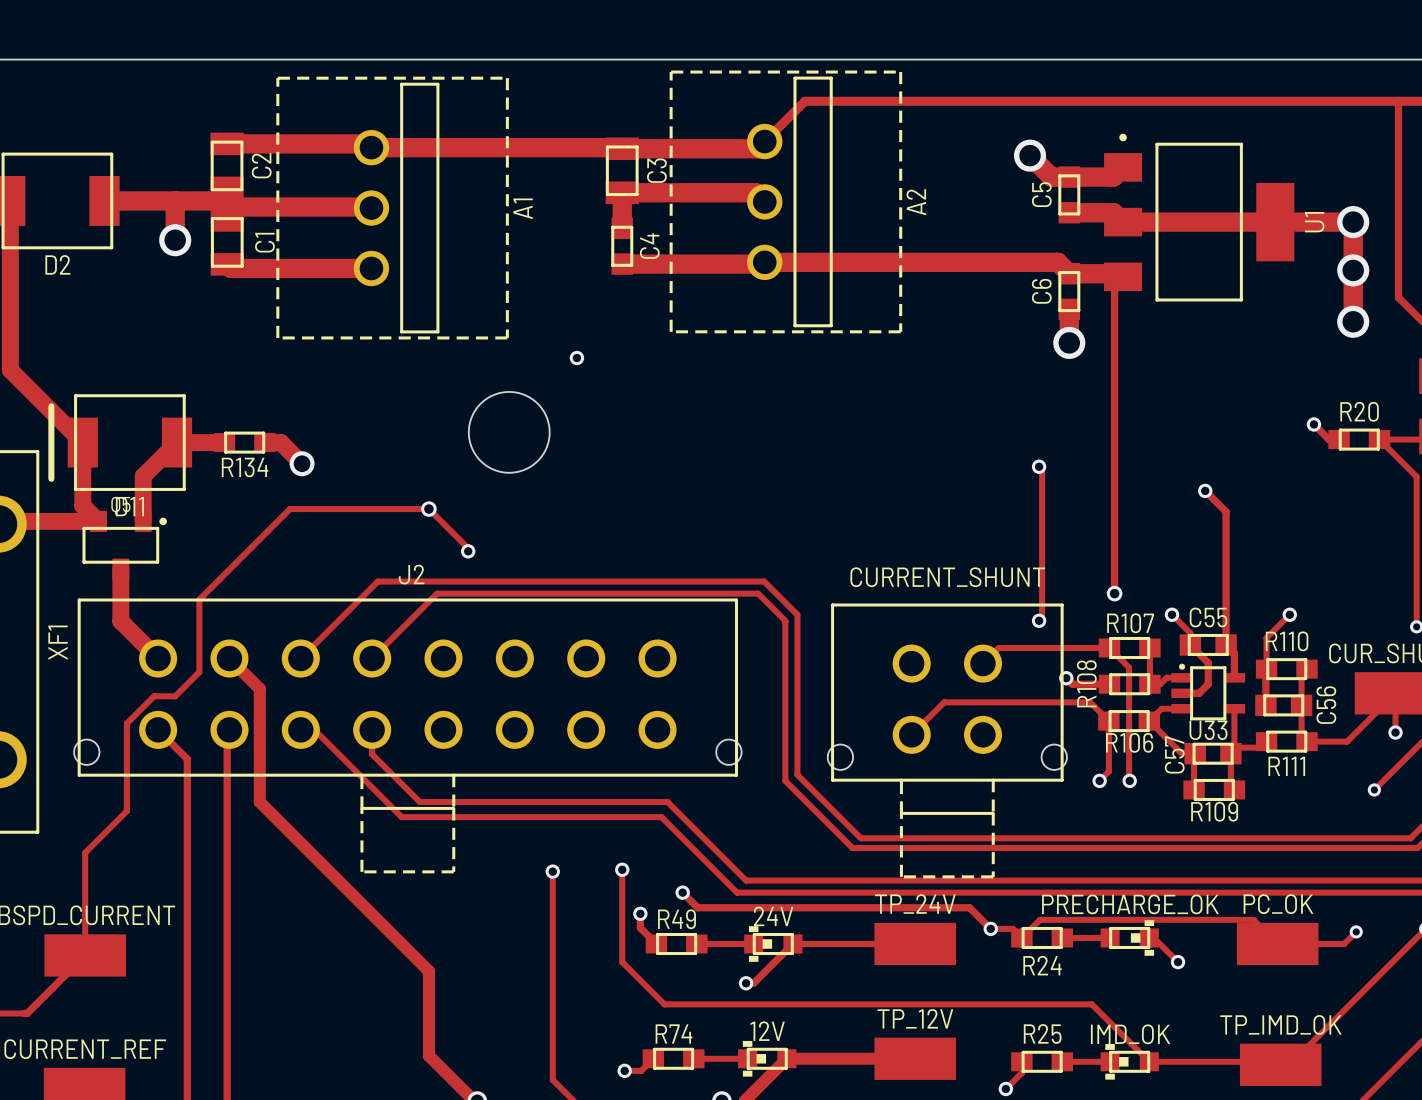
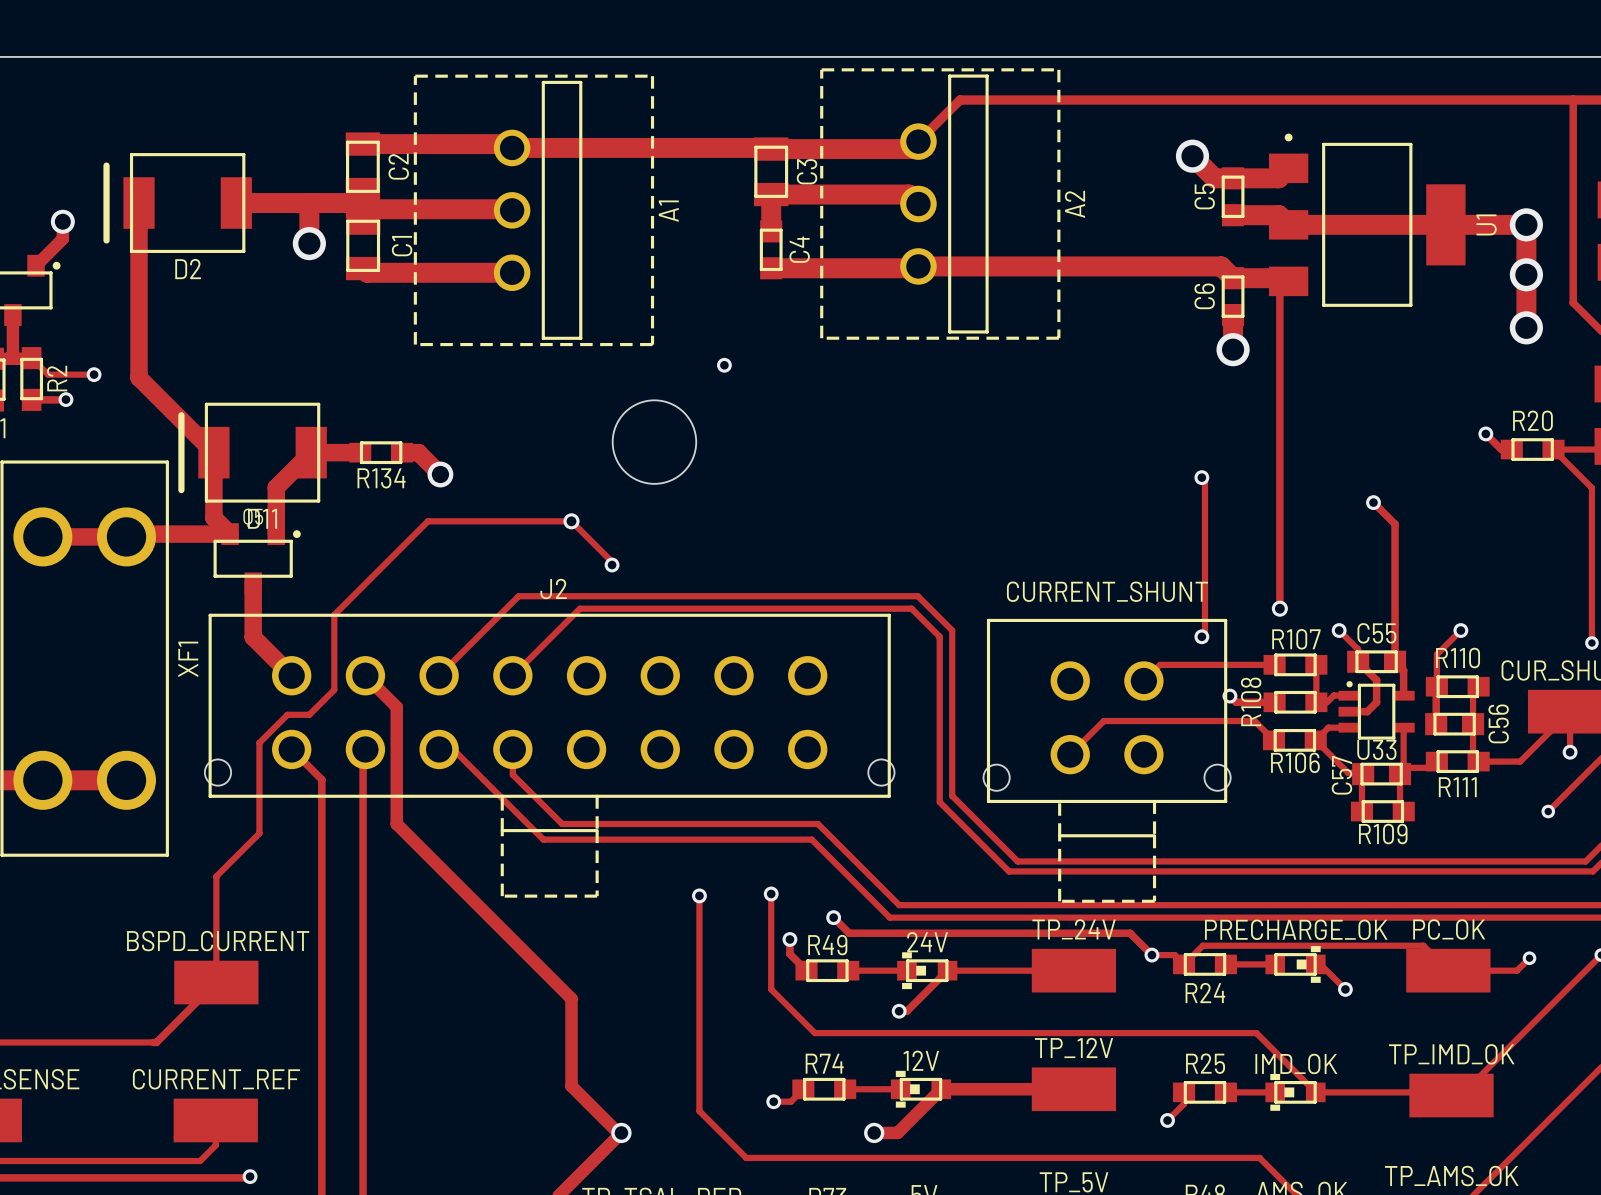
track: (1109, 647) (1129, 667) (1129, 780) -> none
track: (1108, 721) (1108, 771) (1099, 780) -> none
via: (1099, 780) -> none
via: (1129, 780) -> none

